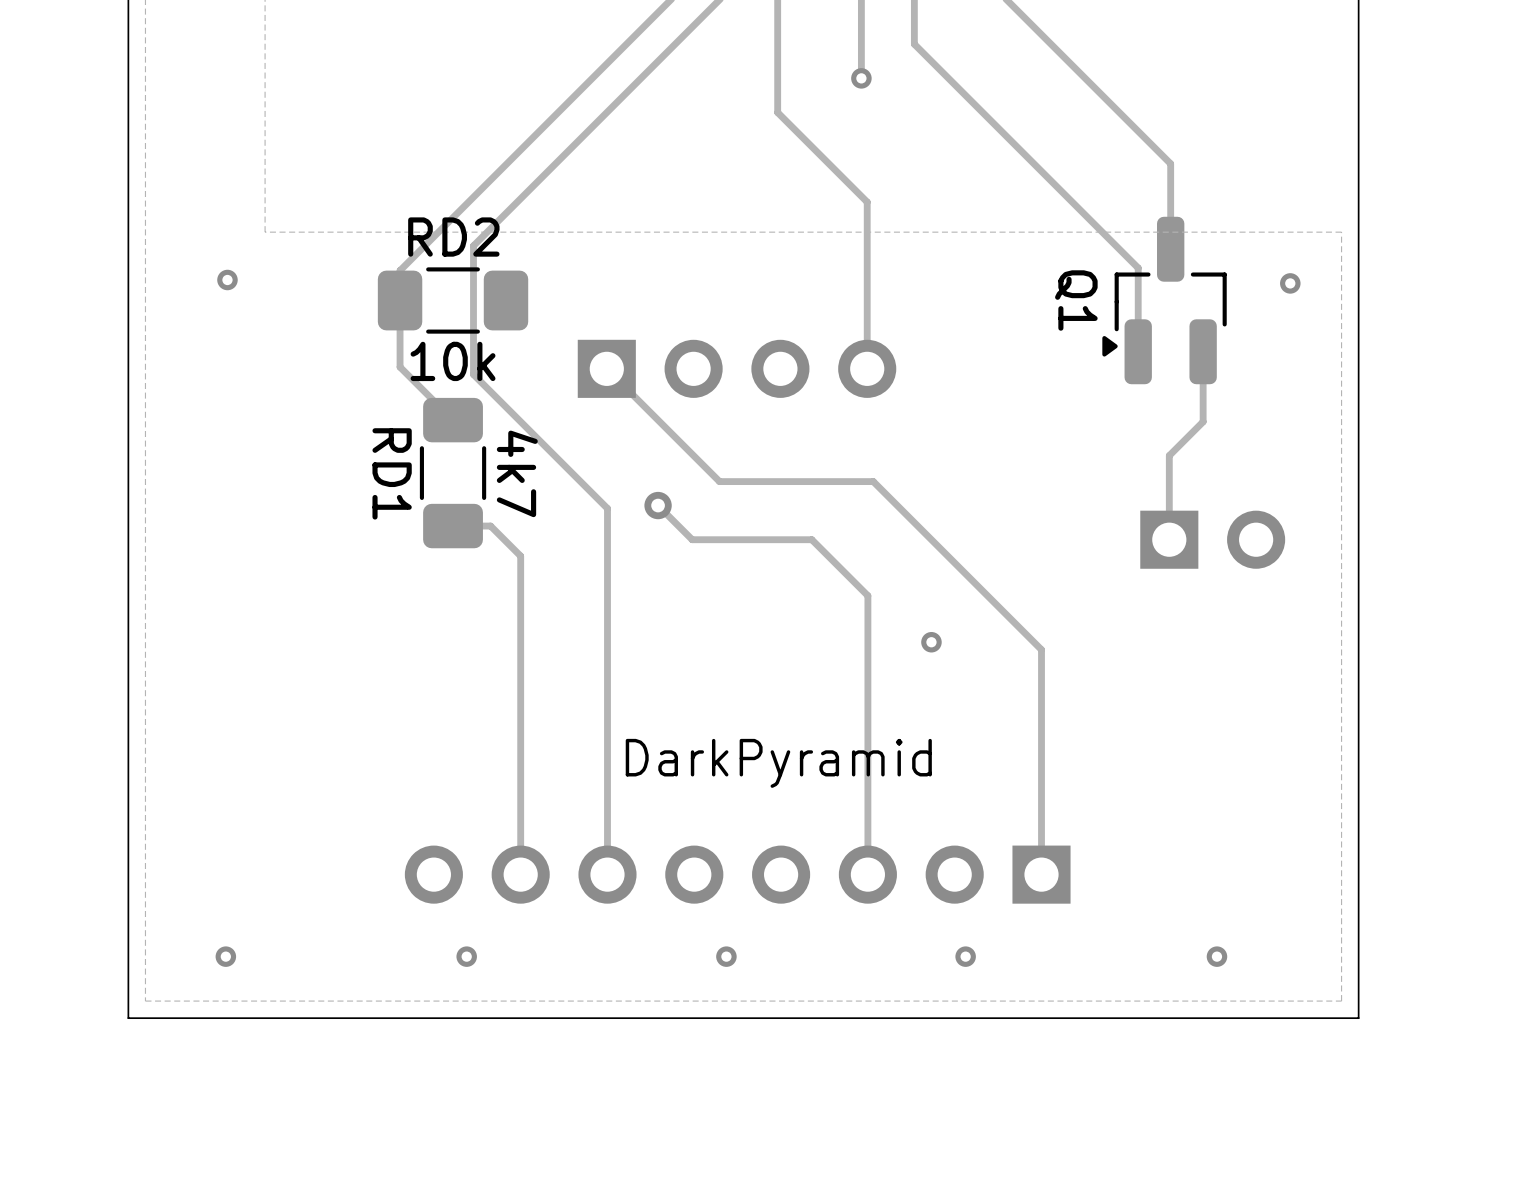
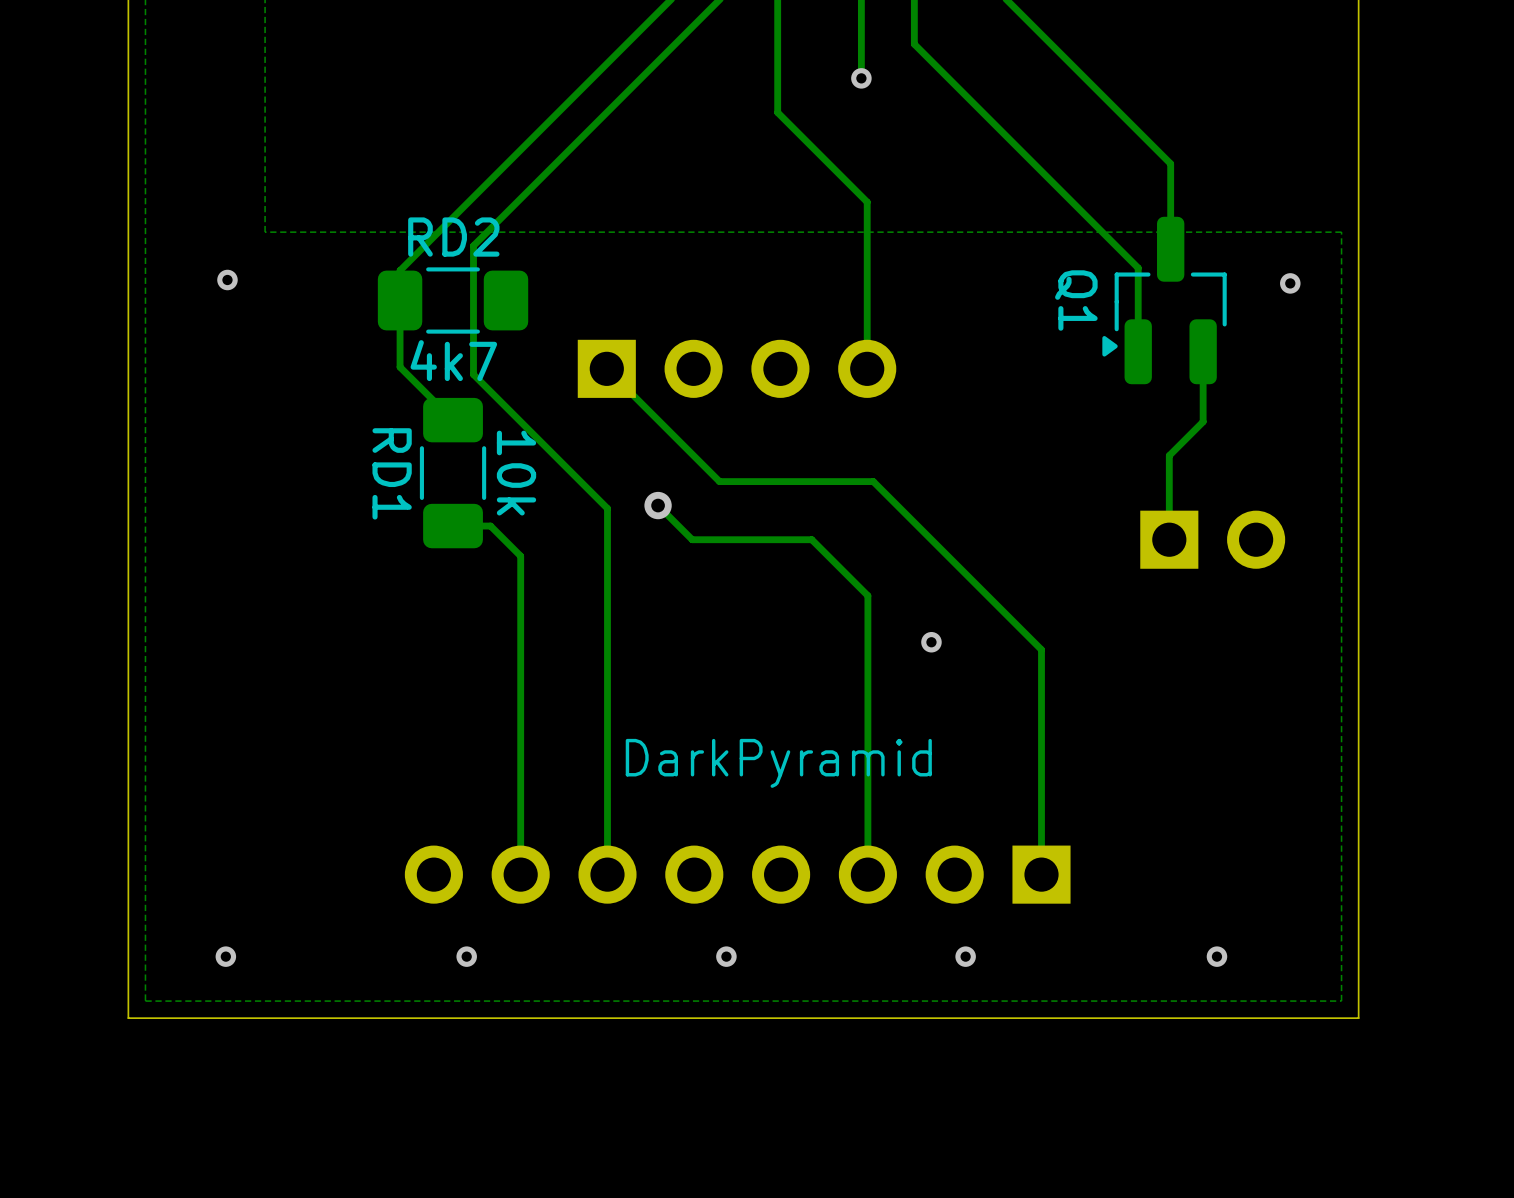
RD2 value: 10k (453, 361) -> 4k7 (453, 360)
RD1 value: 4k7 (517, 473) -> 10k (516, 473)

